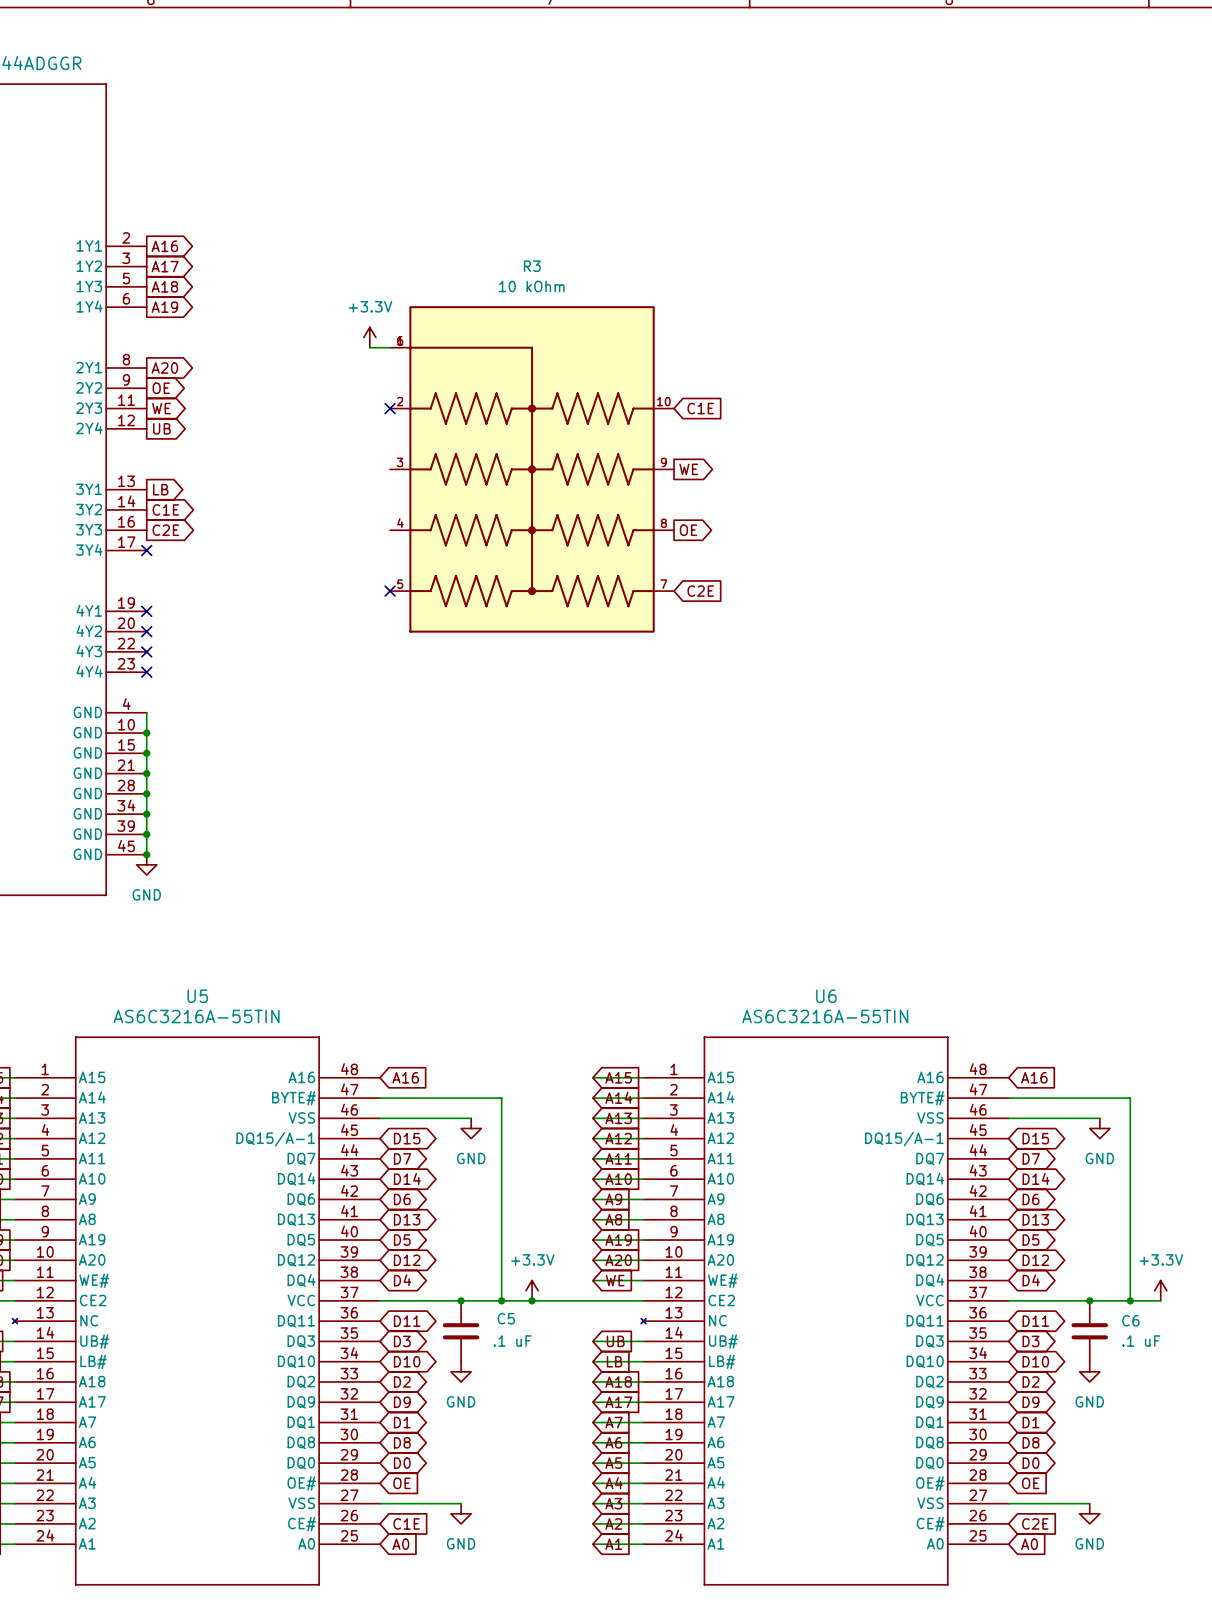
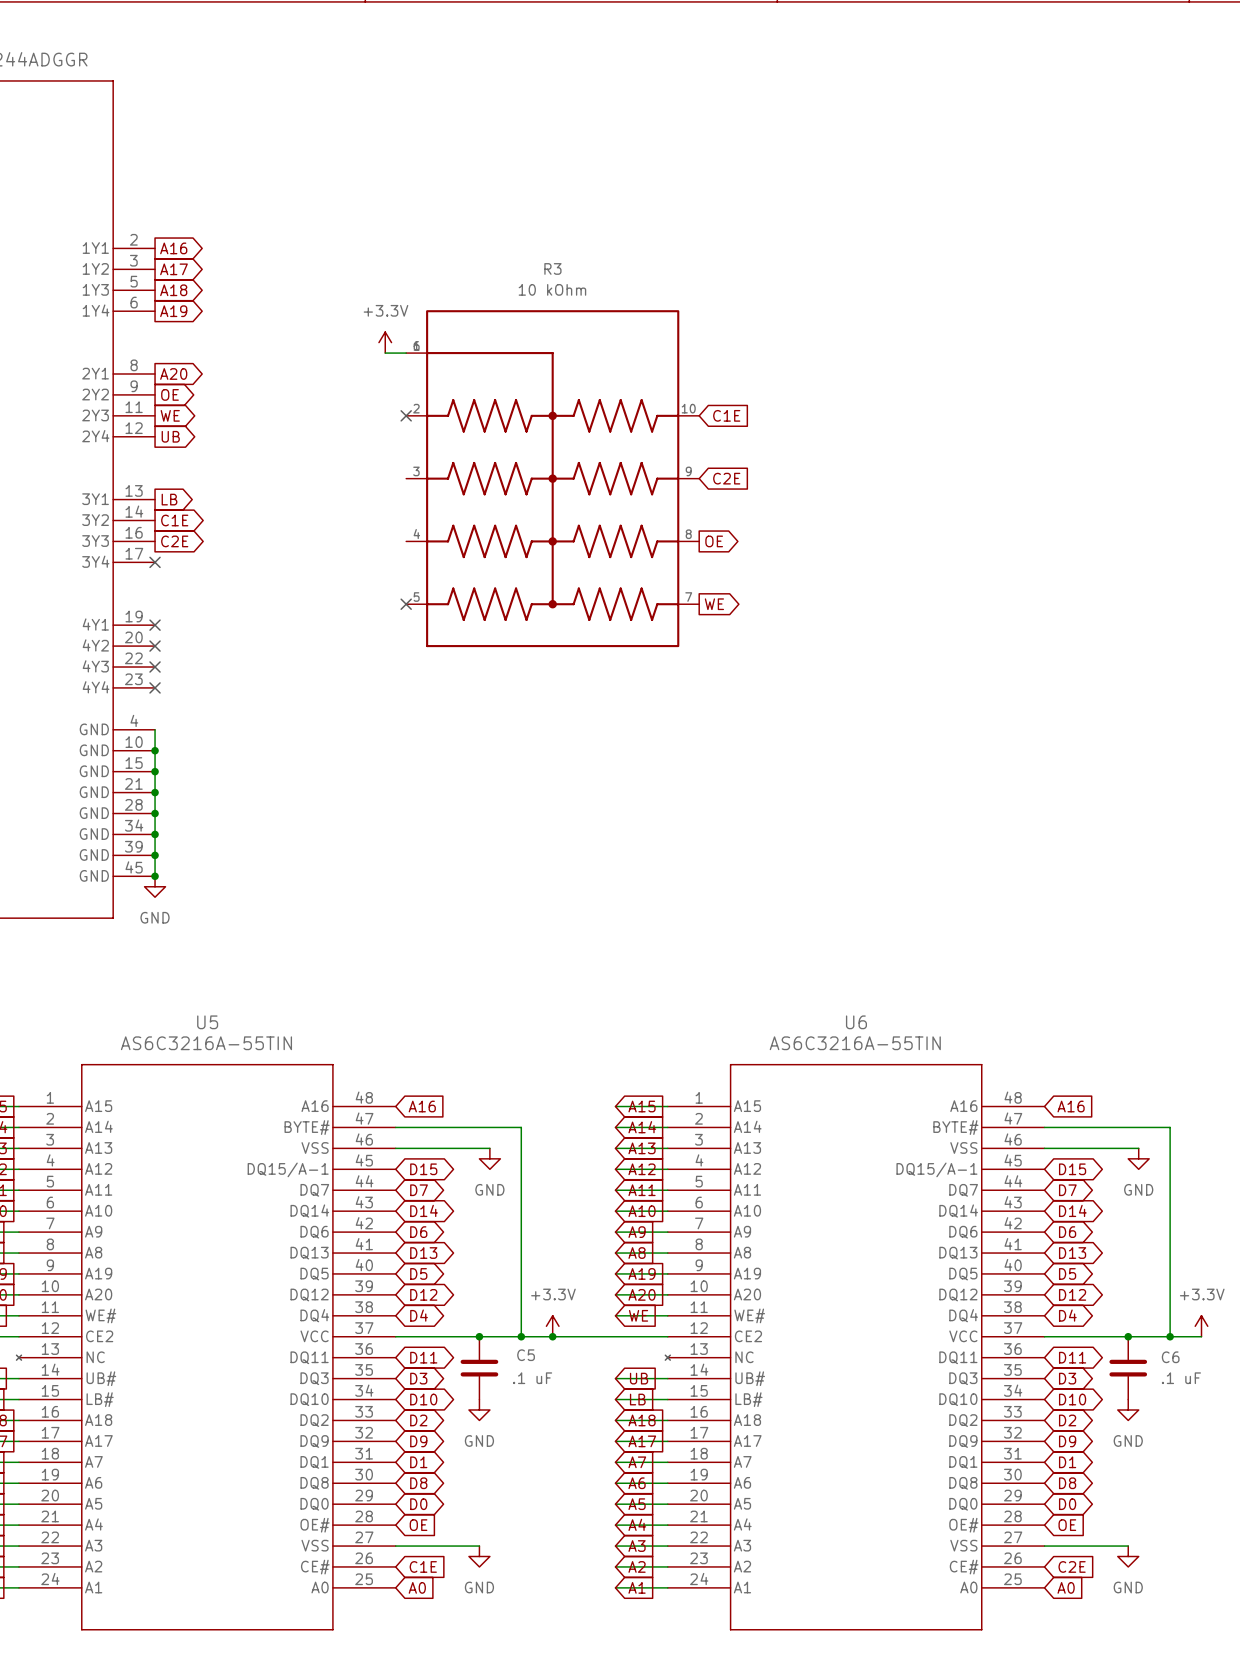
global label shape: output (688, 469) -> input (726, 478)
global label: WE (688, 469) -> C2E (726, 478)
global label shape: input (700, 591) -> output (714, 604)
global label: C2E (700, 591) -> WE (714, 604)

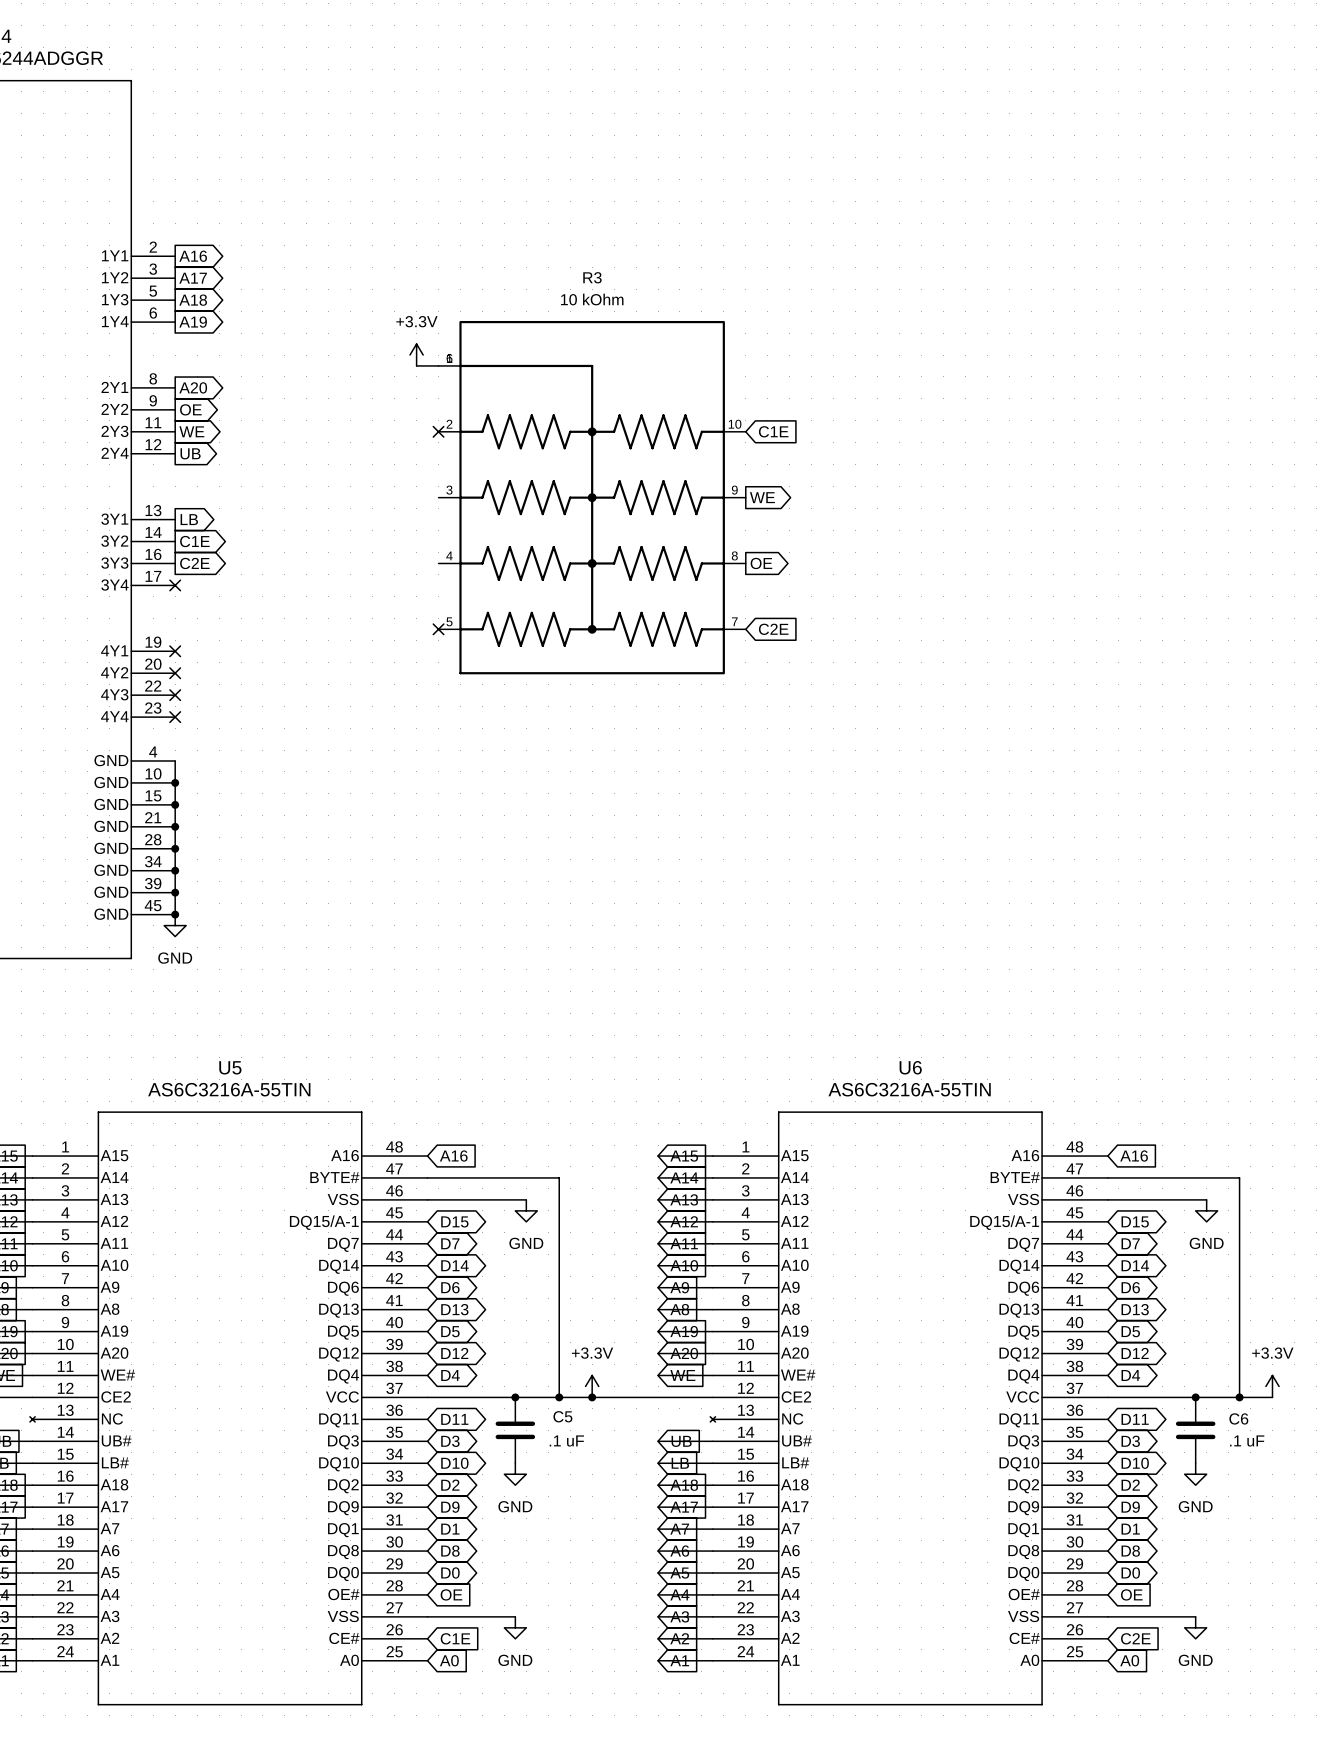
global label shape: input (726, 478) -> output (762, 497)
global label: C2E (726, 478) -> WE (762, 497)
global label shape: output (714, 604) -> input (773, 629)
global label: WE (714, 604) -> C2E (773, 629)

